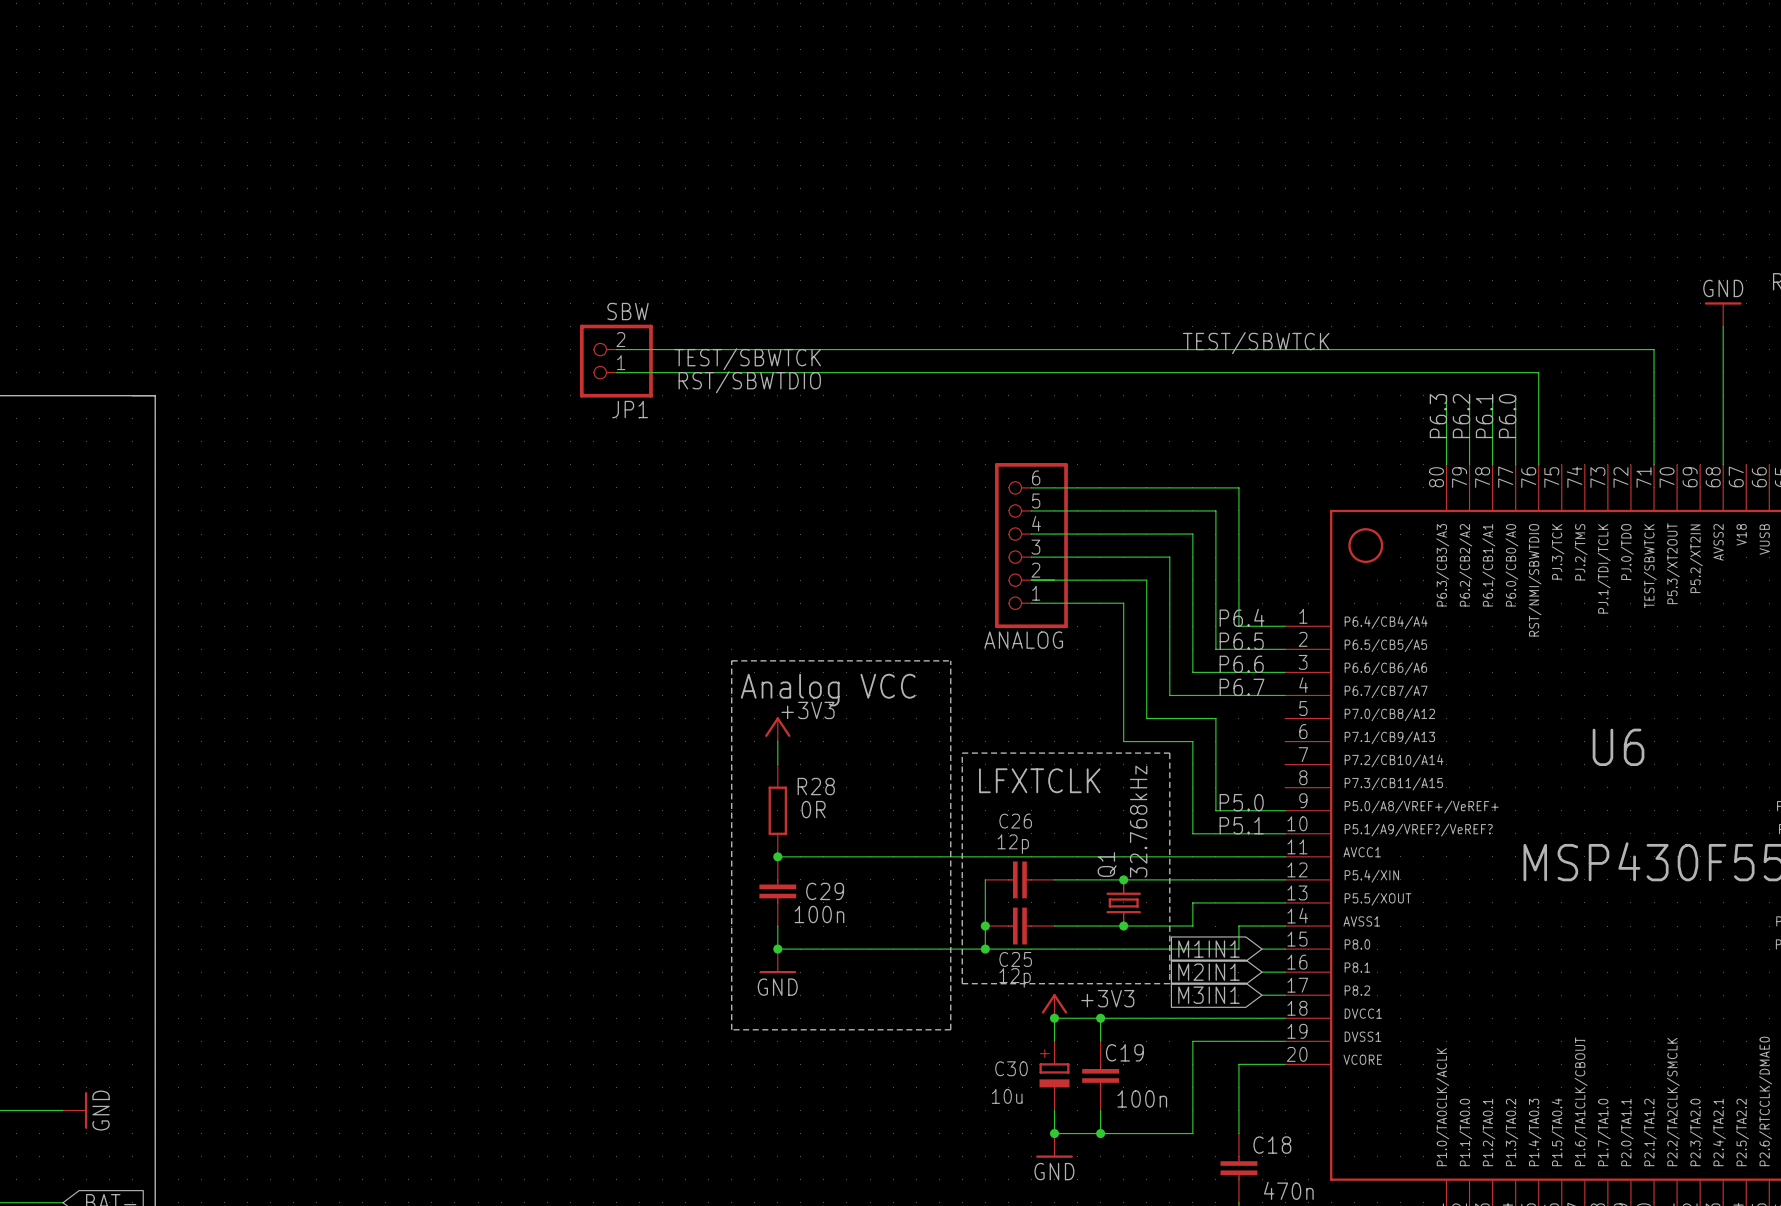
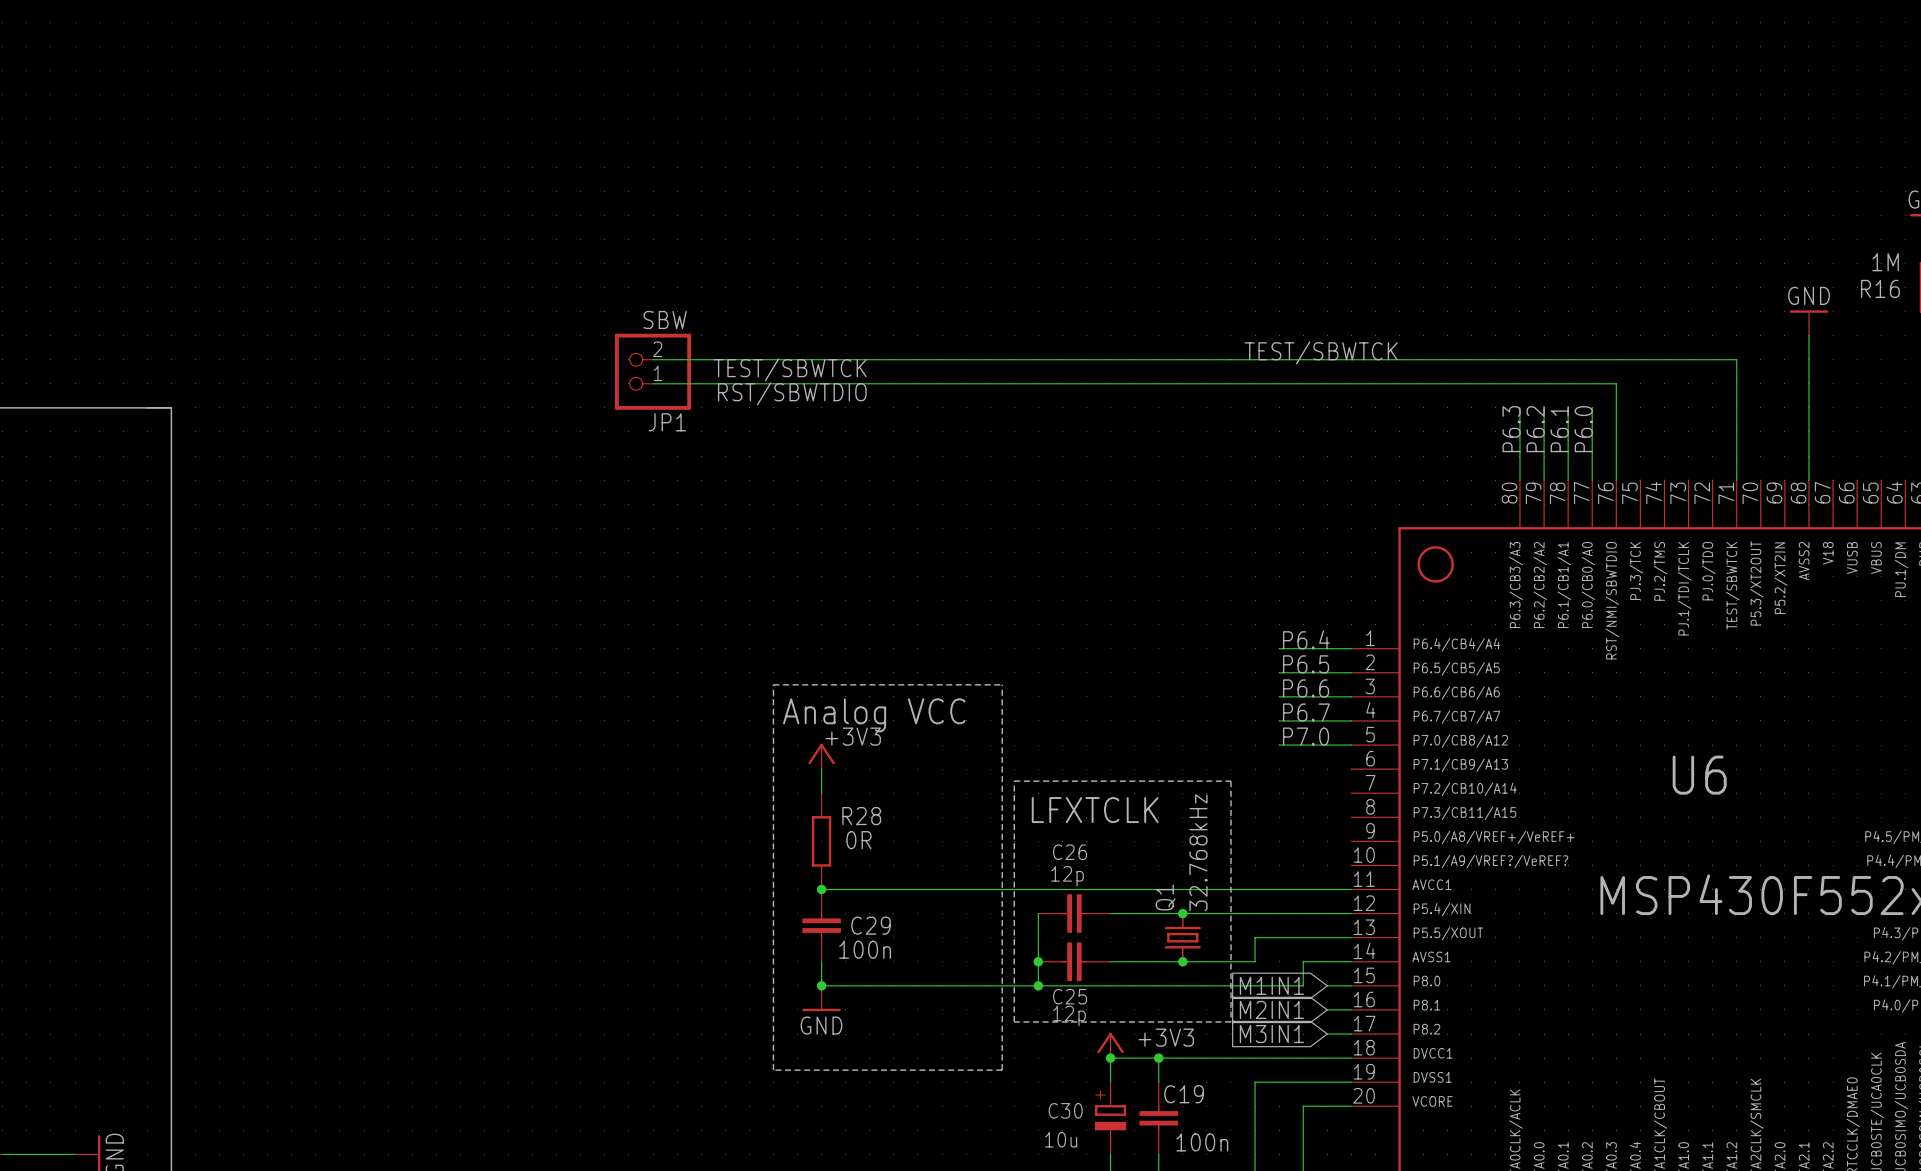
wire: (1031, 487) (1238, 487) (1238, 626) -> (1279, 648) (1303, 648)
wire: (1031, 510) (1215, 510) (1215, 649) -> none
wire: (1031, 534) (1192, 534) (1192, 672) (1215, 672) -> none
ANALOG: (1031, 545) -> none
wire: (1031, 557) (1169, 557) (1169, 695) (1215, 695) -> none
wire: (1031, 580) (1146, 580) (1146, 718) (1215, 718) (1215, 810) (1285, 810) -> none
wire: (1031, 603) (1123, 603) (1123, 741) (1192, 741) (1192, 833) (1285, 833) -> none
label: none -> P7.0 (1306, 736)
wire: none -> (1279, 745) (1351, 745)
label: P5.0 (1241, 802) -> none
label: P5.1 (1241, 825) -> none

